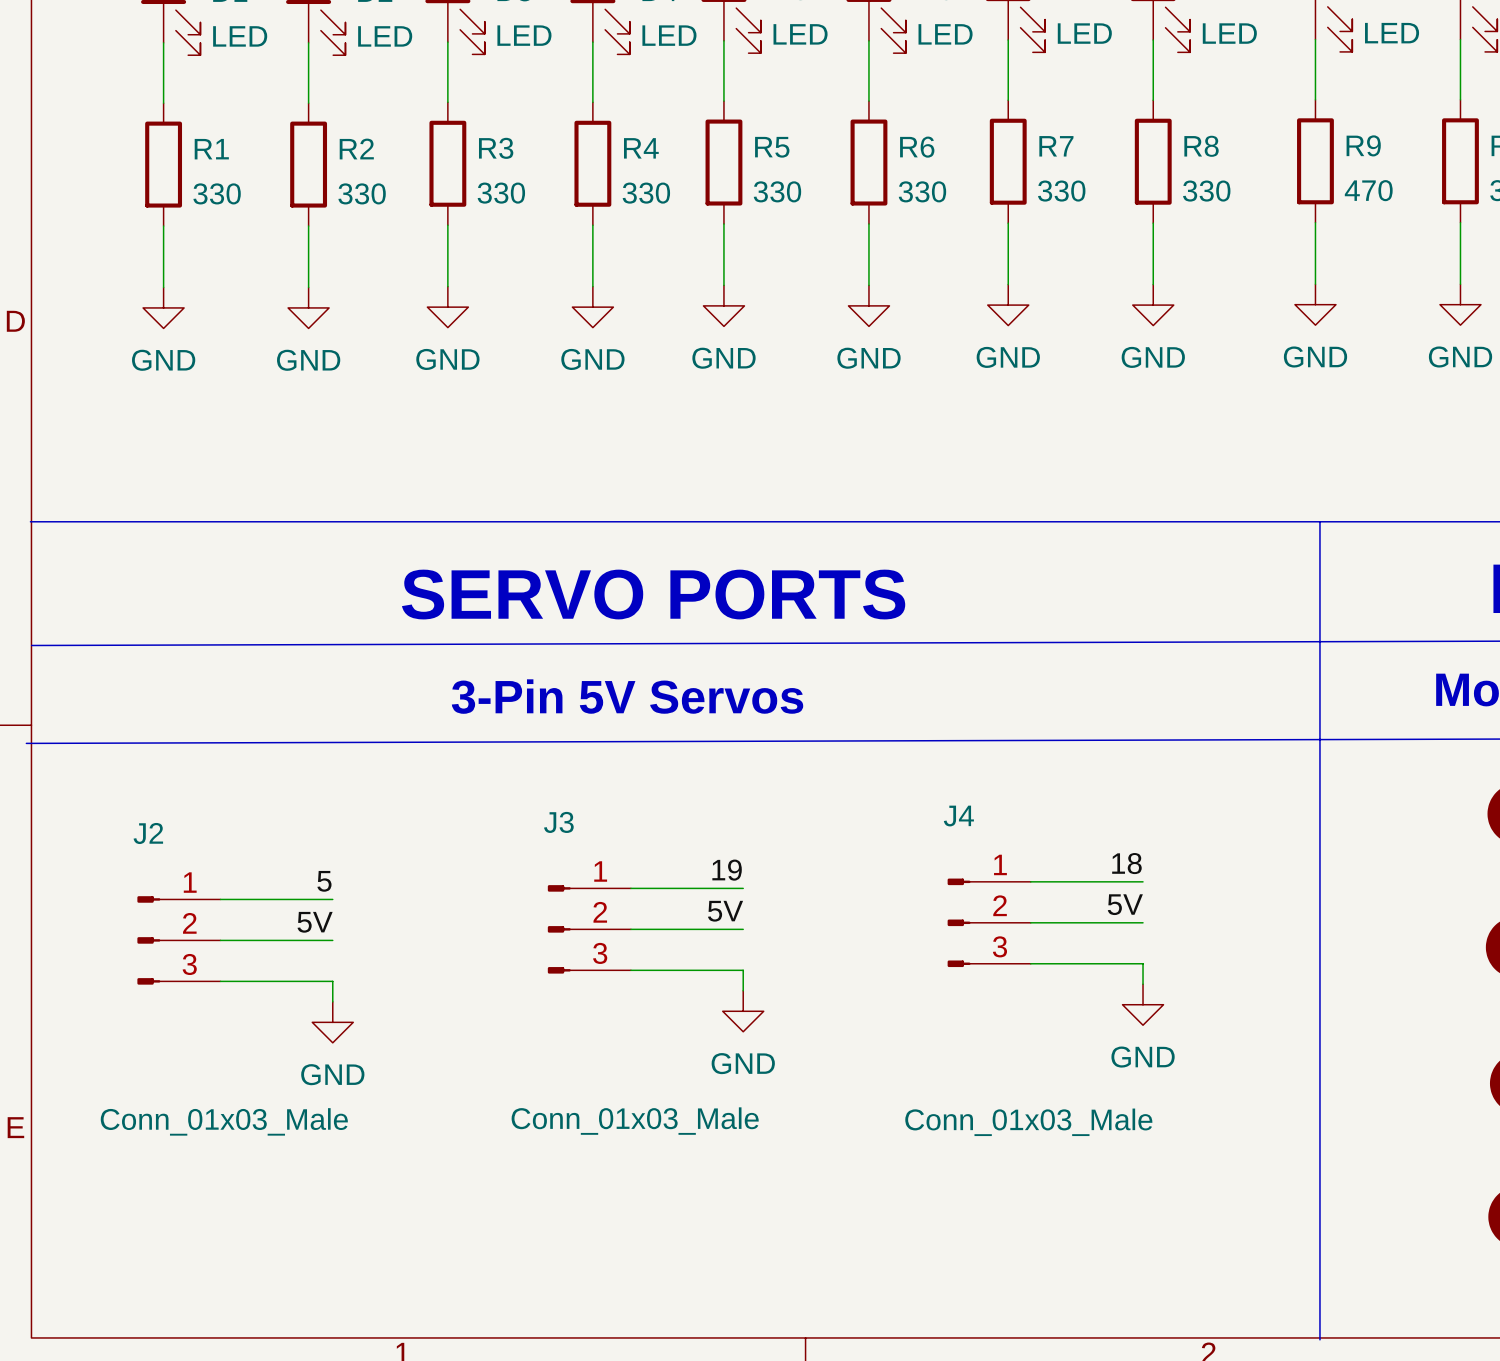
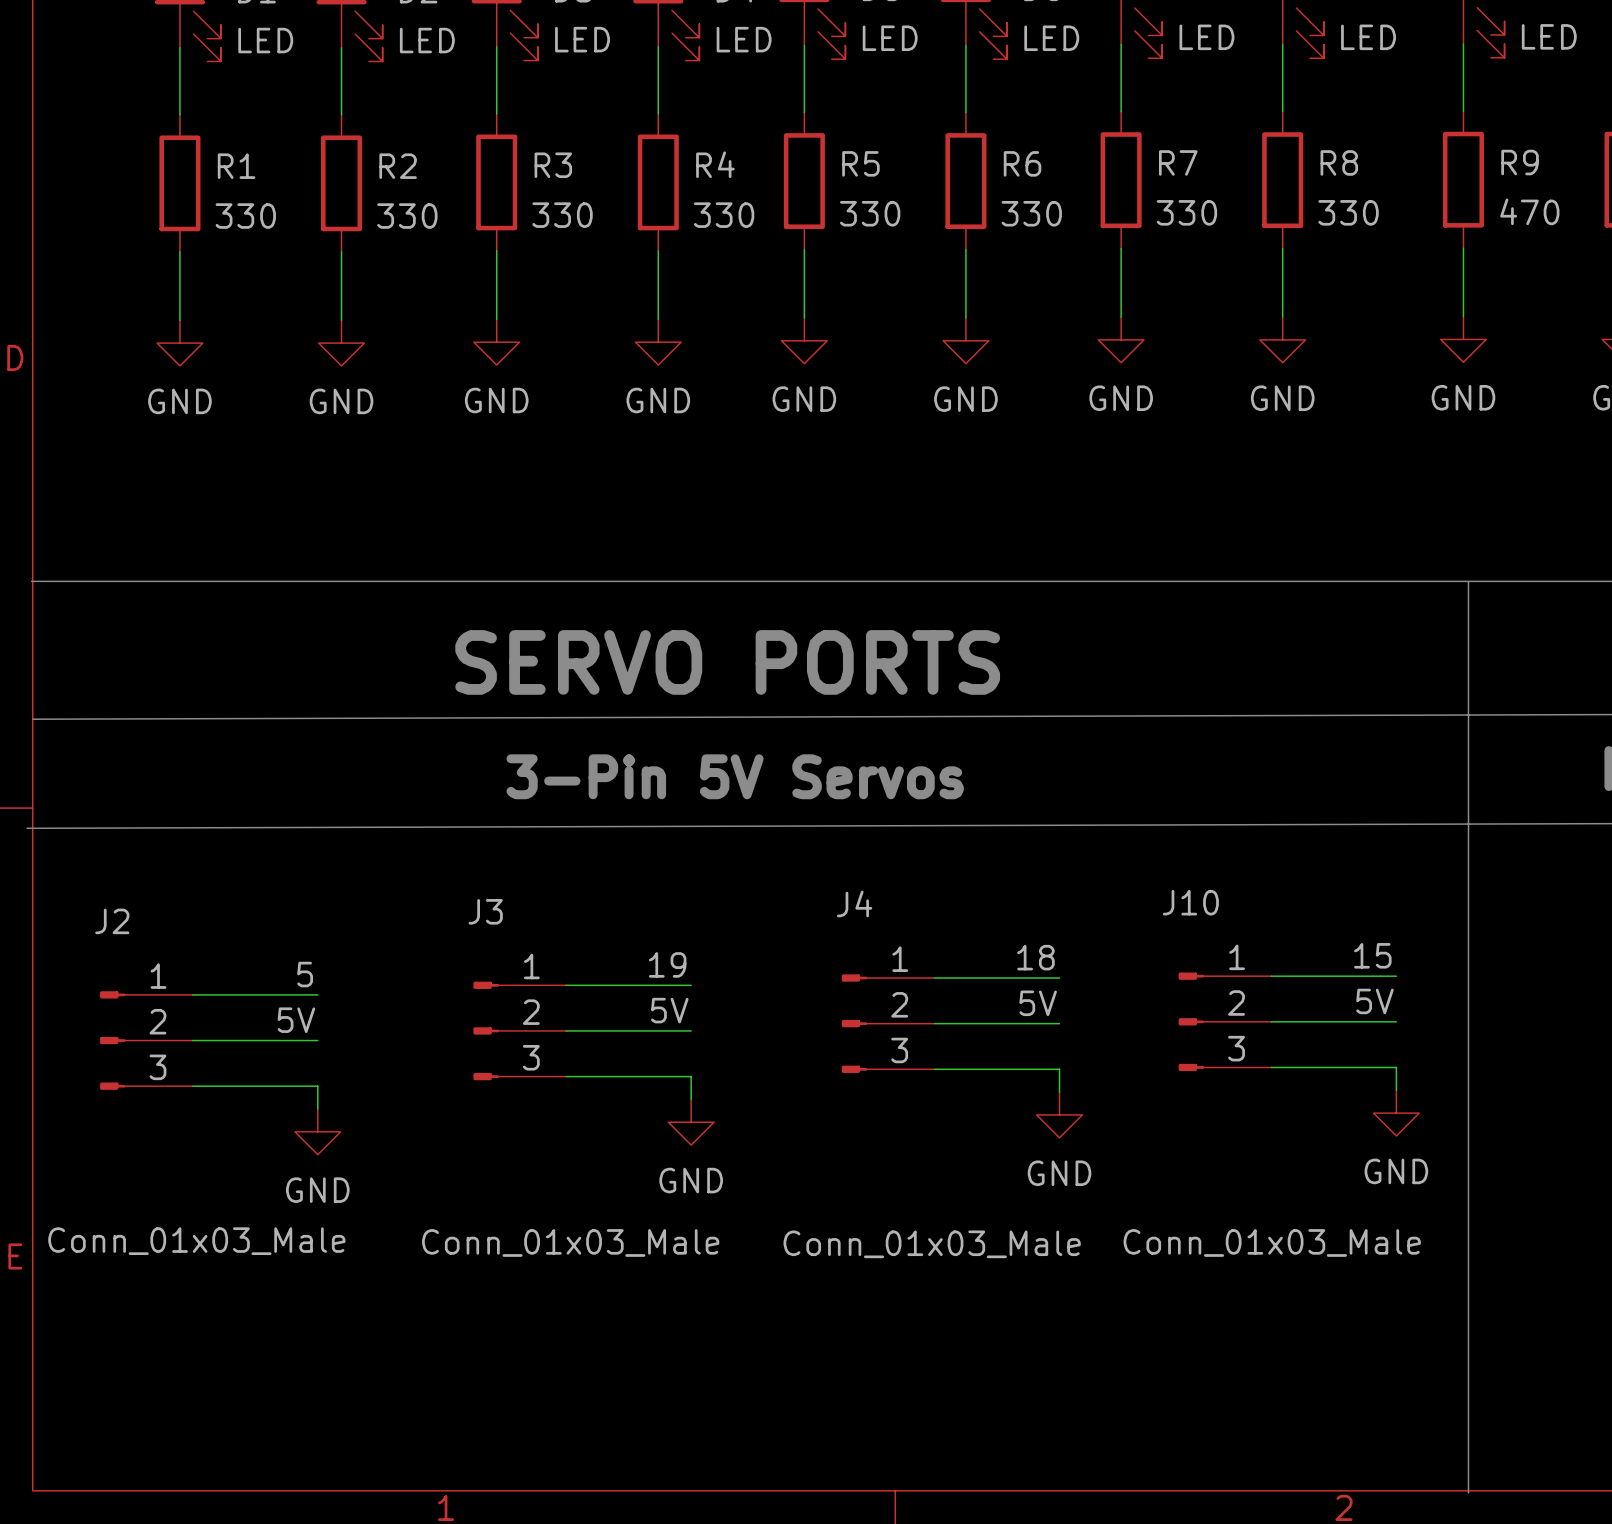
label: none -> 15 (1372, 955)
label position: 18 (1126, 863) -> 18 (1035, 957)
label position: 19 (727, 870) -> 19 (667, 964)
wire: none -> (934, 978) (1059, 978)
label position: 5 (324, 881) -> 5 (305, 974)
wire: (1030, 881) (1143, 881) -> (1271, 976) (1396, 976)
wire: (630, 888) (743, 888) -> (566, 985) (691, 985)
label: none -> 5V (1375, 1001)
wire: (220, 899) (332, 899) -> (192, 994) (317, 994)
label: none -> 5V (1038, 1003)
label: 5V (1125, 904) -> none
label: none -> 5V (669, 1010)
label: 5V (725, 911) -> none
J10: none -> Conn_01x03_Male (1224, 1021)
wire: none -> (934, 1023) (1059, 1023)
label position: 5V (315, 922) -> 5V (296, 1020)
J4 position: (989, 922) -> (888, 1023)
wire: (1030, 922) (1143, 922) -> (1271, 1021) (1396, 1021)
J3 position: (589, 929) -> (519, 1030)
wire: (630, 929) (743, 929) -> (566, 1030) (691, 1030)
J2 position: (178, 940) -> (146, 1040)
wire: (220, 940) (332, 940) -> (192, 1040) (317, 1040)
wire: none -> (934, 1069) (1059, 1069) (1059, 1092)
wire: (1030, 963) (1143, 963) (1143, 984) -> (1271, 1067) (1396, 1067) (1396, 1090)
wire: (630, 970) (743, 970) (743, 990) -> (566, 1076) (691, 1076) (691, 1099)
wire: (220, 981) (332, 981) (332, 1001) -> (192, 1086) (317, 1086) (317, 1109)
power symbol: none -> GND (1396, 1113)
power symbol: none -> GND (1059, 1114)
power symbol: GND (1143, 1004) -> none
power symbol: none -> GND (691, 1122)
power symbol: GND (743, 1011) -> none
power symbol position: GND (332, 1022) -> GND (317, 1131)

